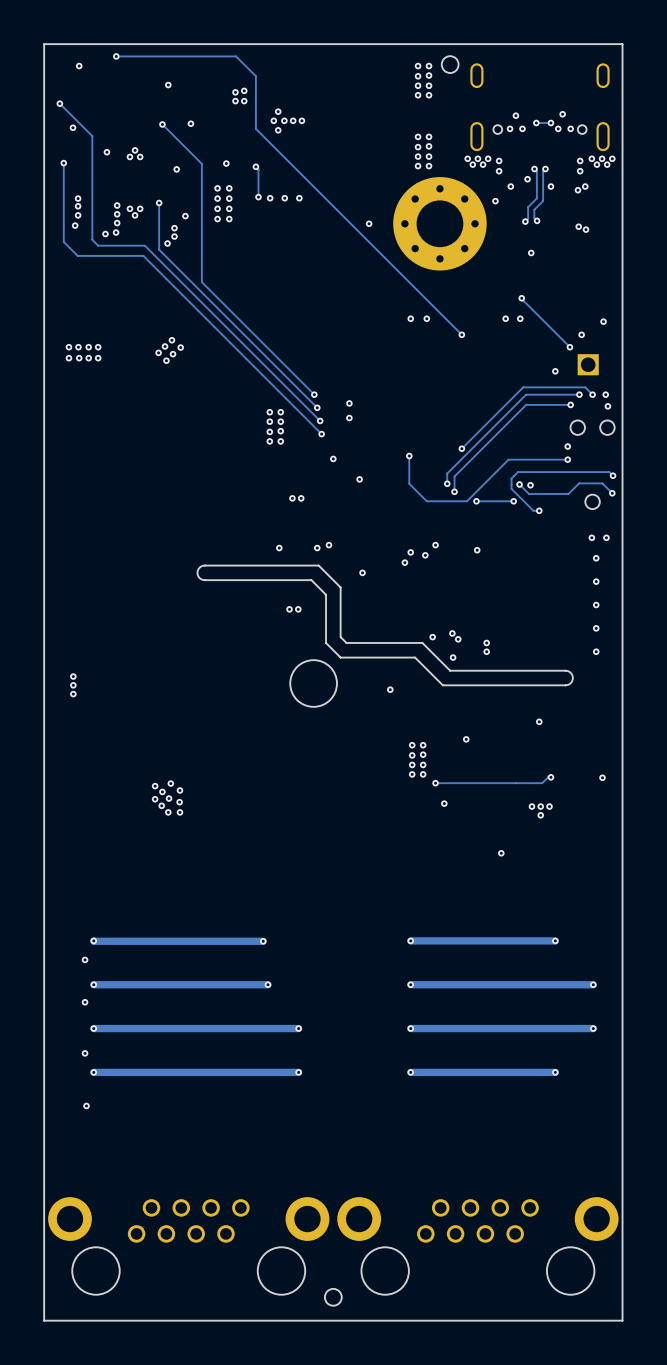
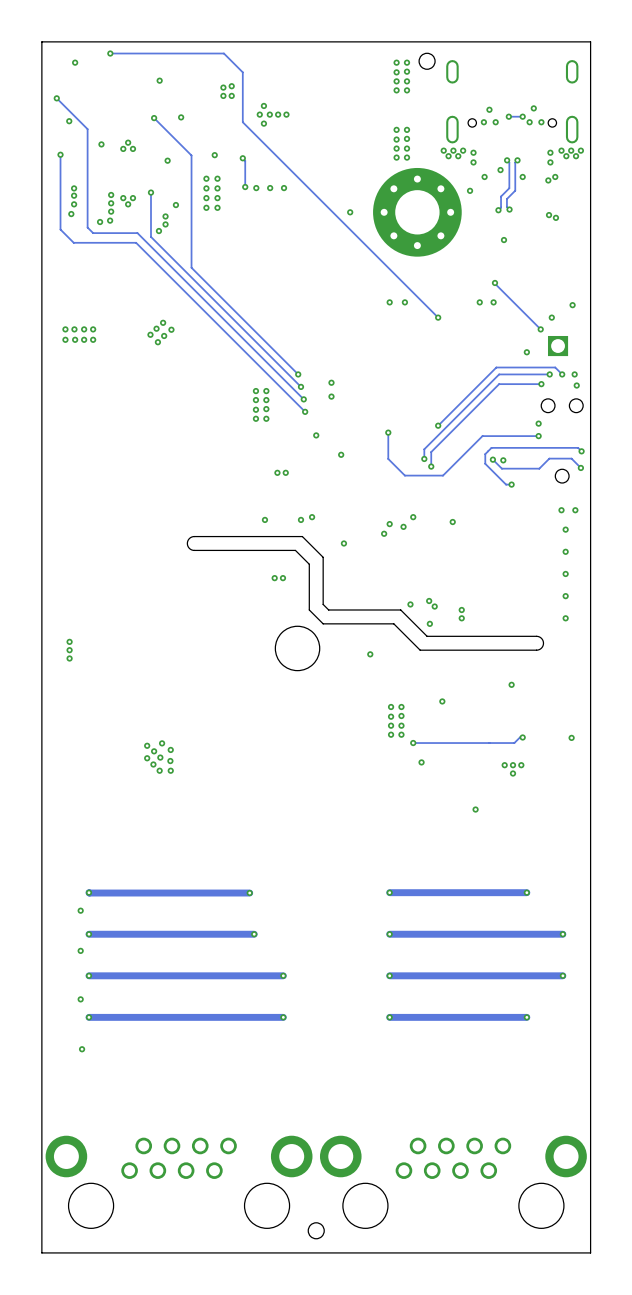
via: (476, 501) -> none
track: (513, 501) (476, 501) -> none
via: (513, 501) -> none

